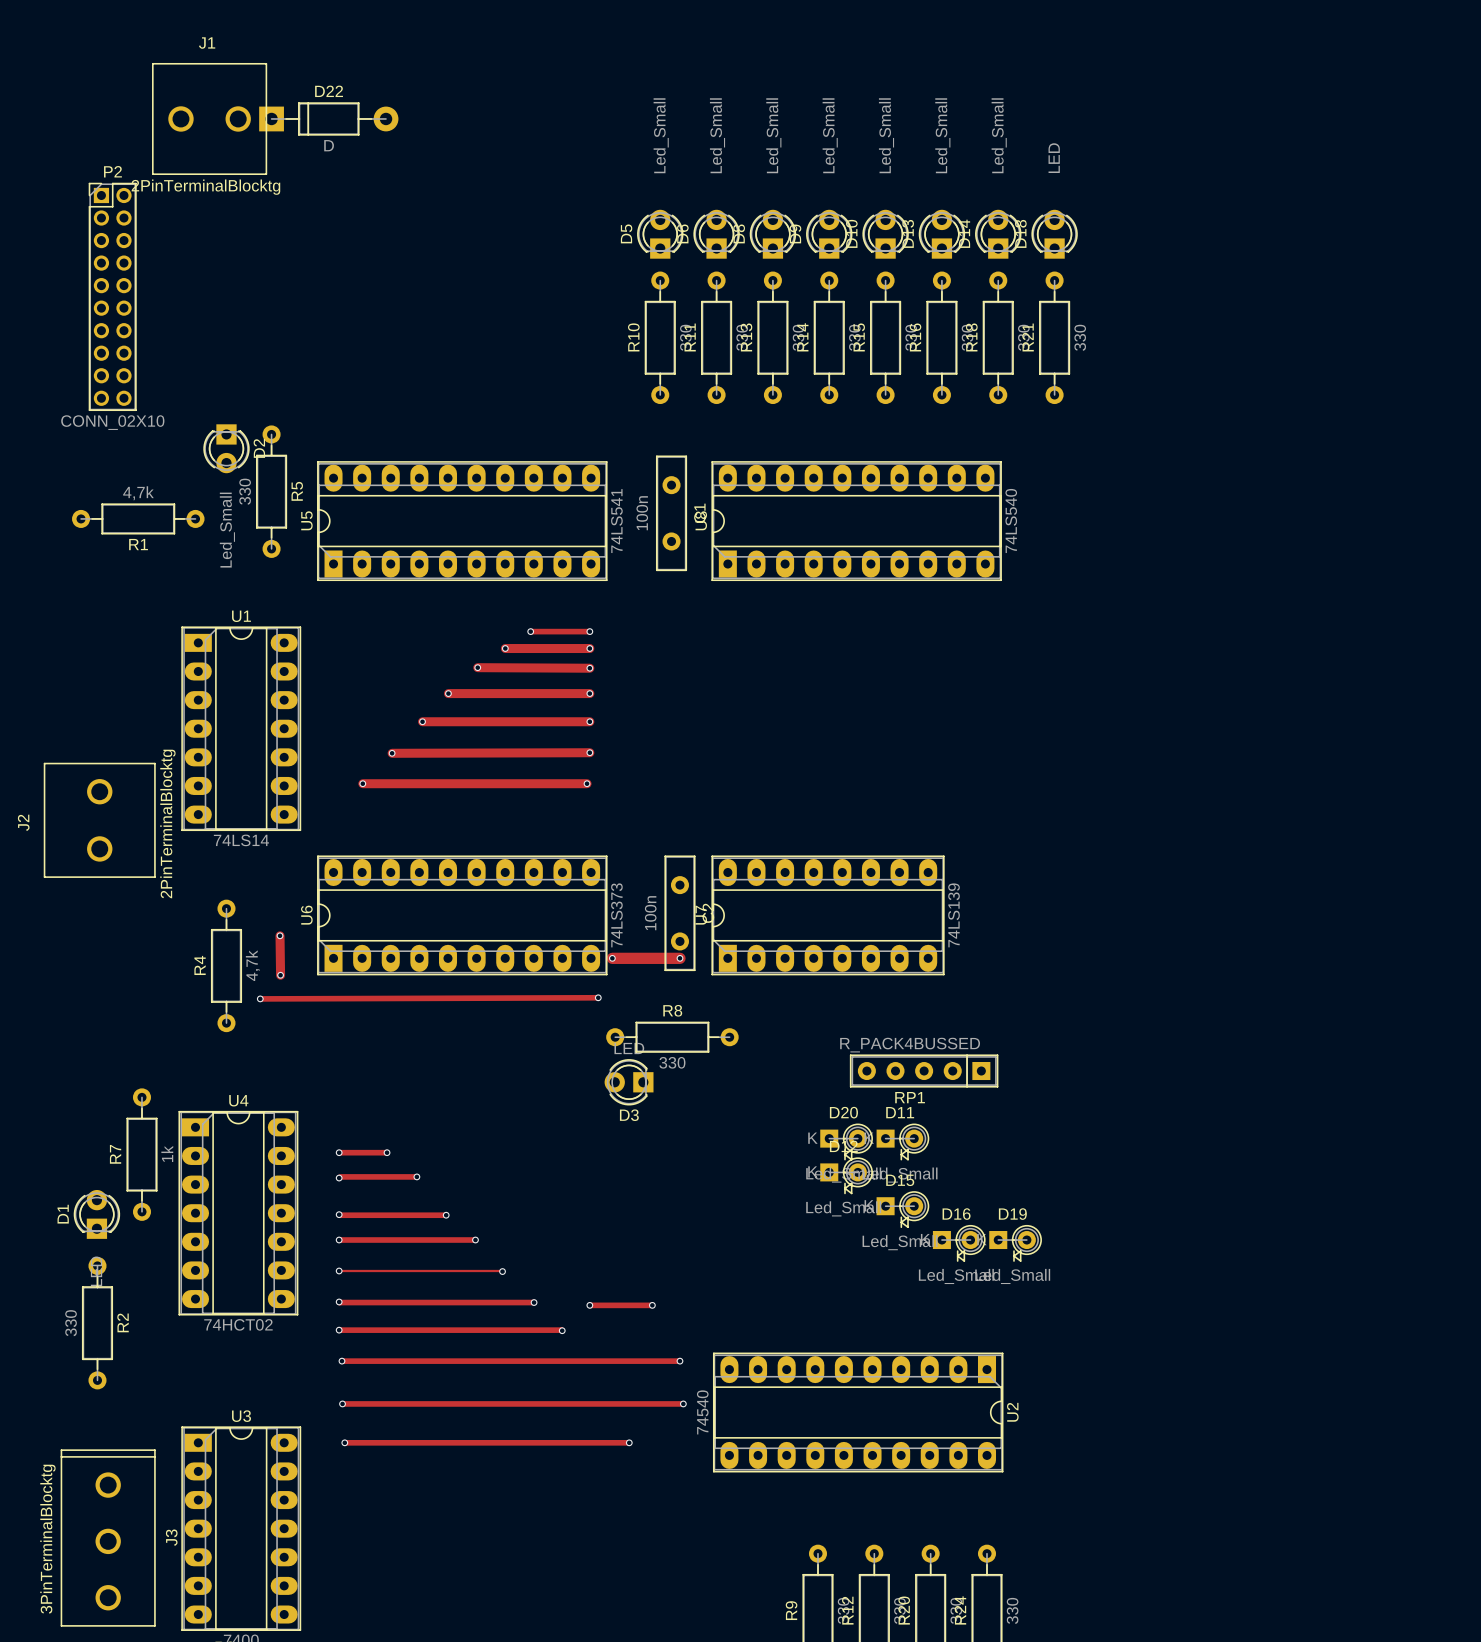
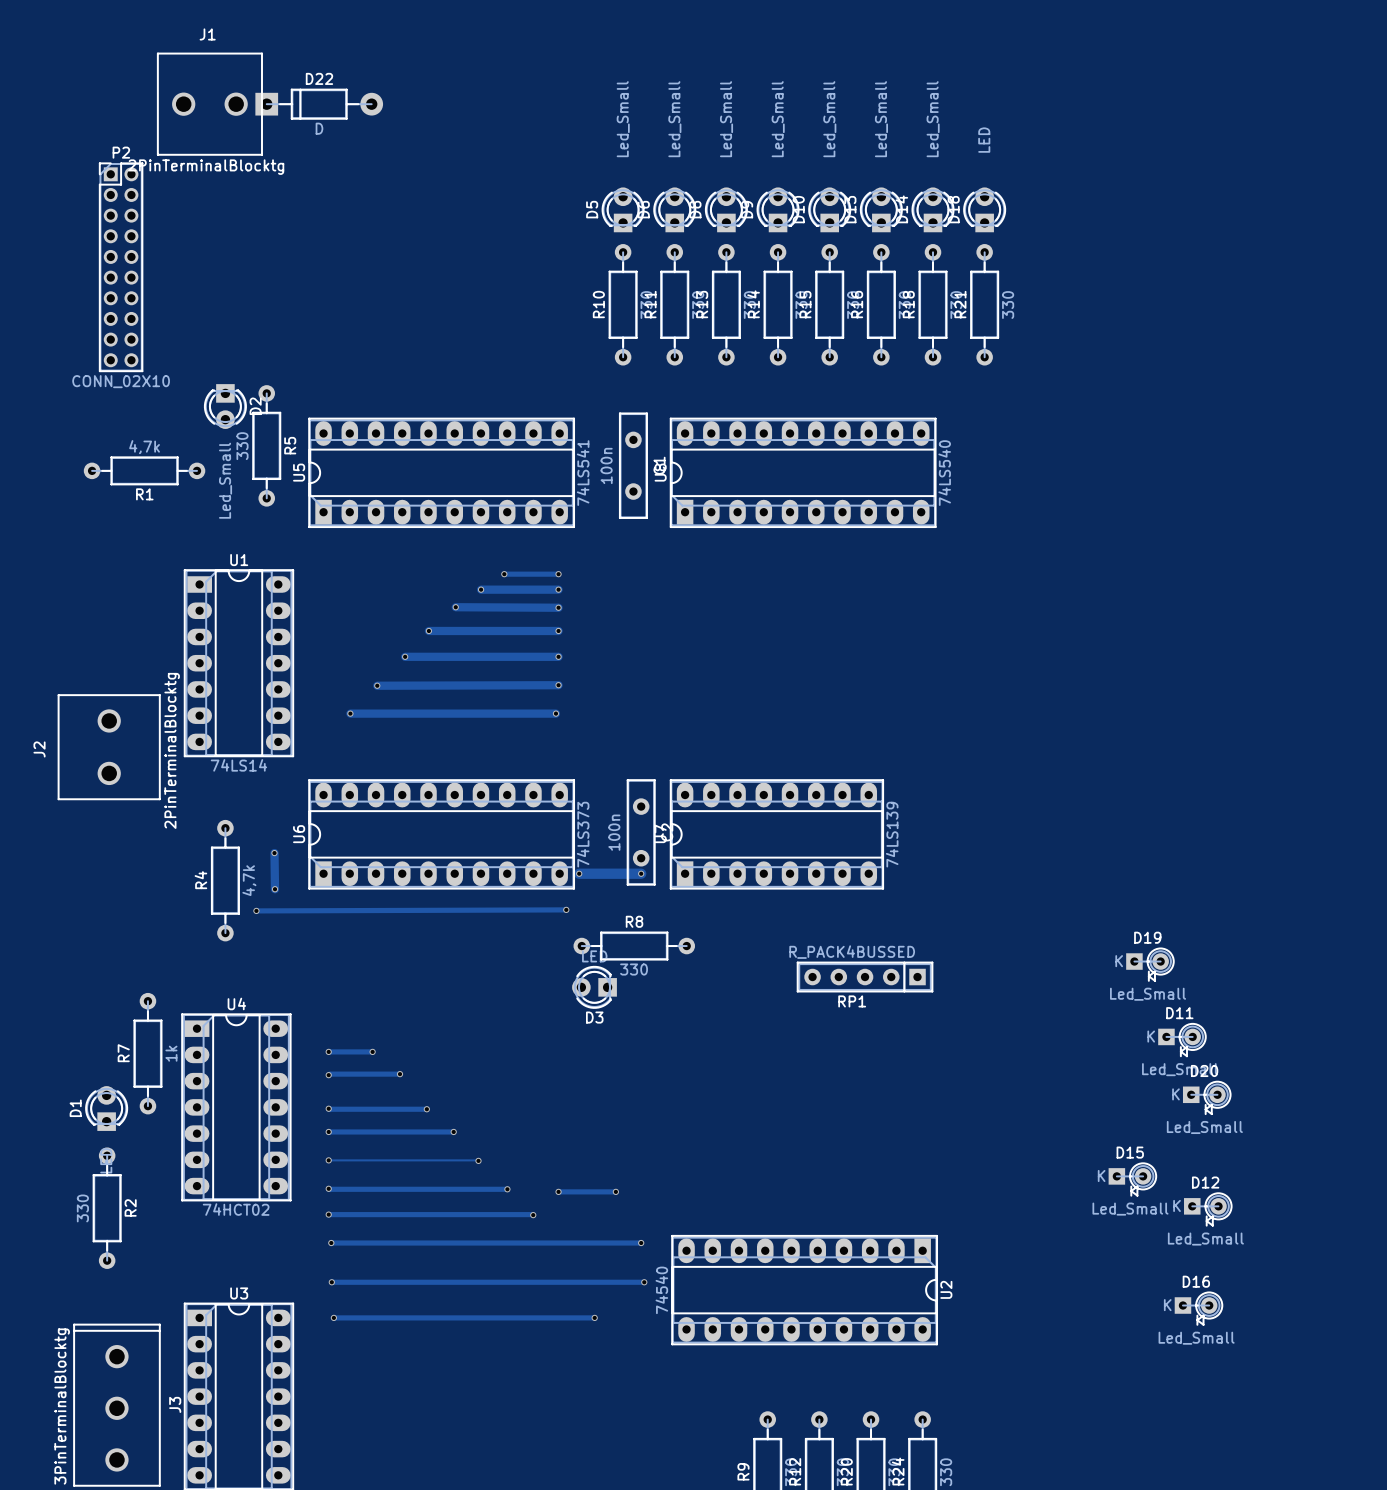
D20 position: (846, 1142) -> (1207, 1097)
D11 position: (902, 1142) -> (1182, 1040)
D12 position: (846, 1175) -> (1208, 1209)
D15 position: (902, 1209) -> (1132, 1179)
D16 position: (959, 1243) -> (1198, 1308)
D19 position: (1015, 1243) -> (1150, 964)

